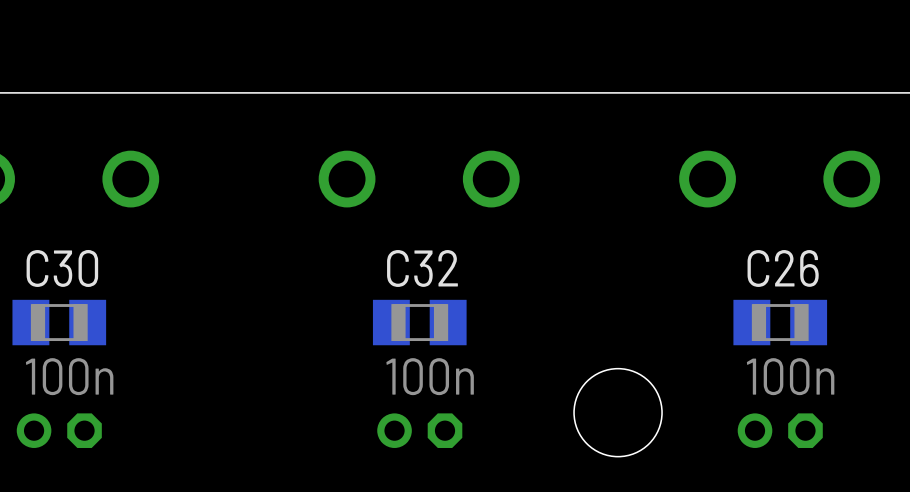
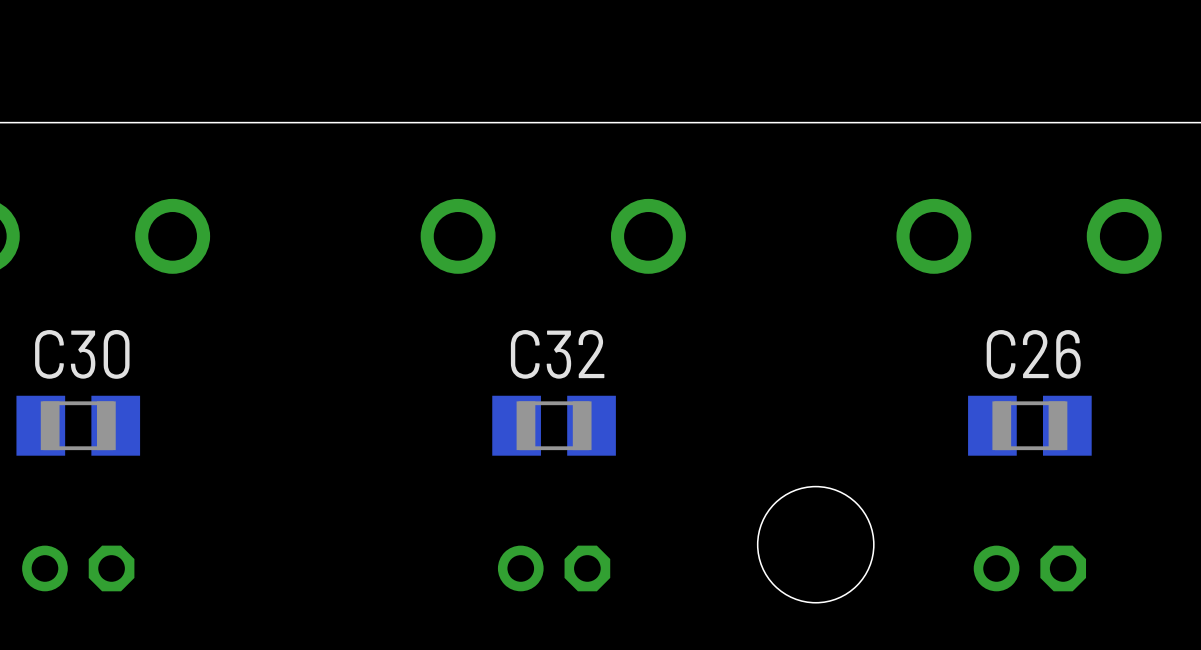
C30 value: 100n (69, 376) -> none
C32 value: 100n (430, 376) -> none
C26 value: 100n (790, 376) -> none

